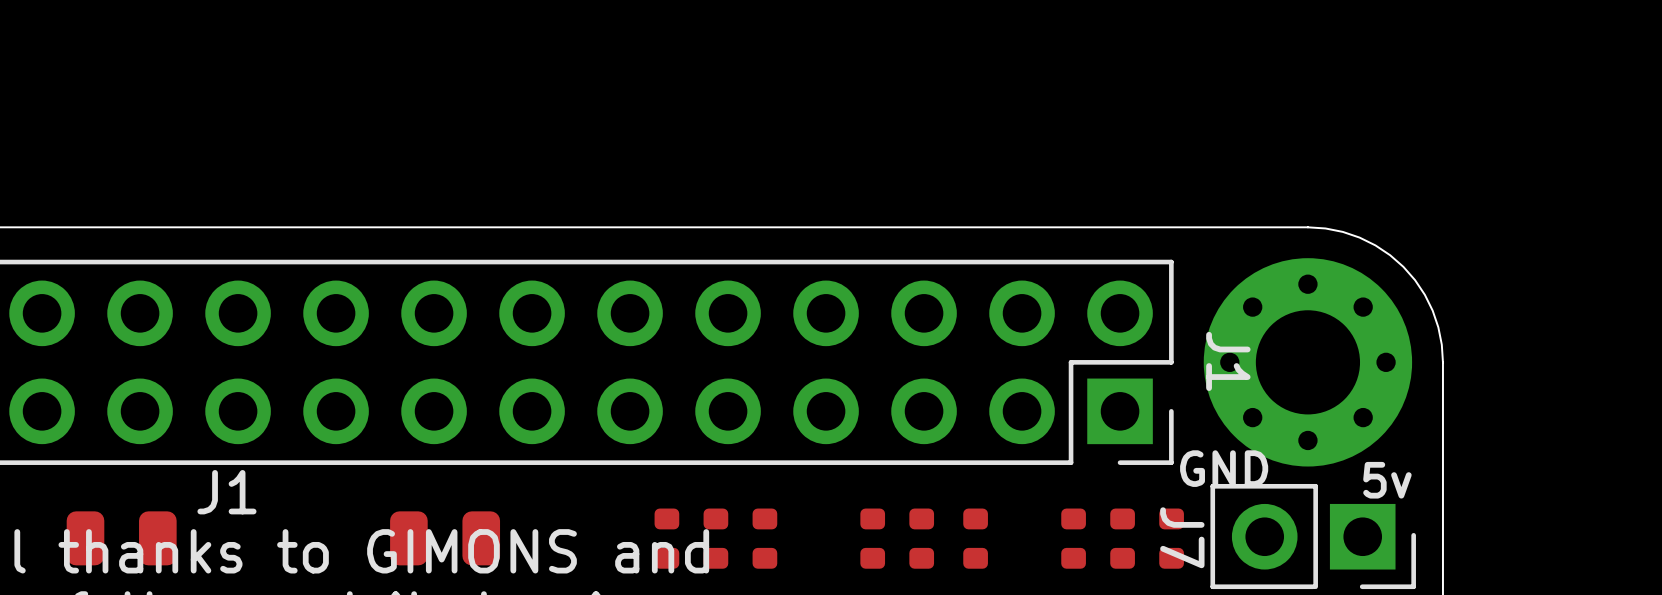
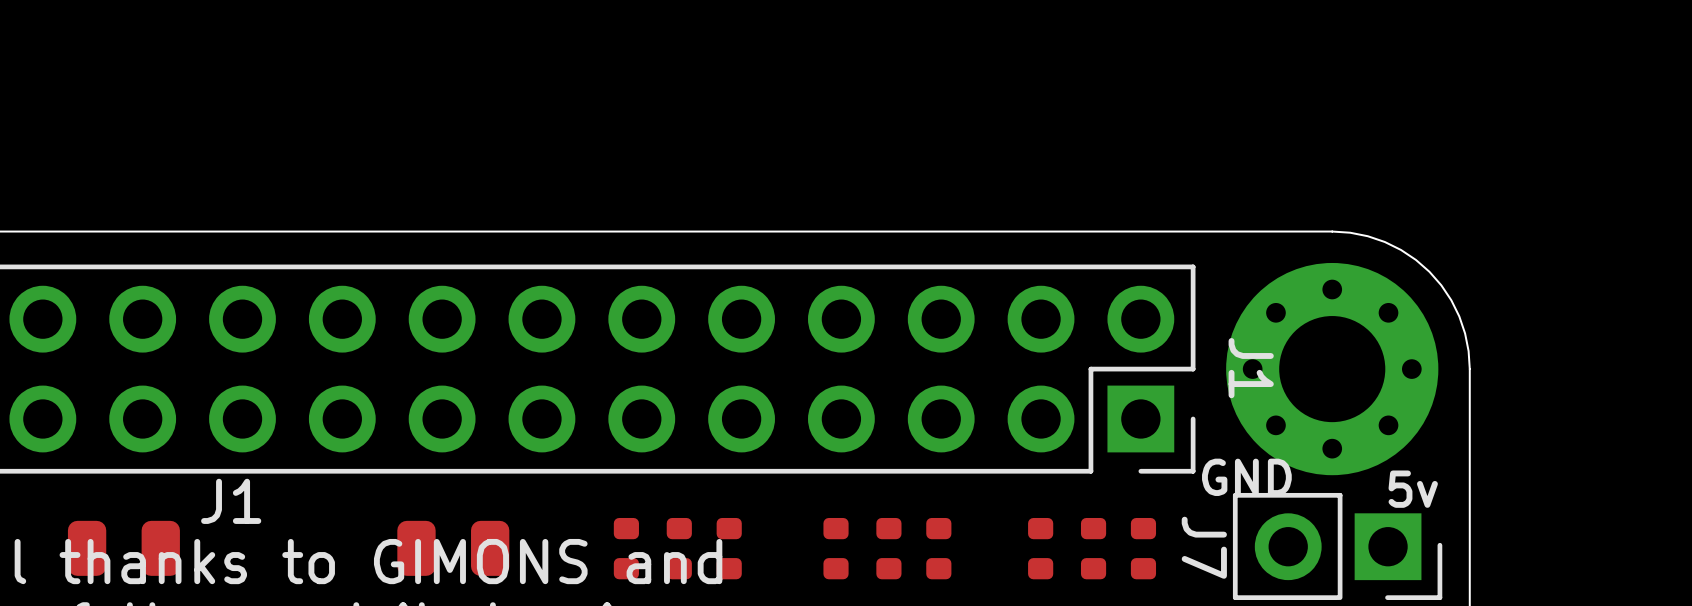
part: none -> (626, 548)
part position: (764, 538) -> (836, 548)
part position: (975, 538) -> (1040, 548)
part: (1171, 538) -> none

